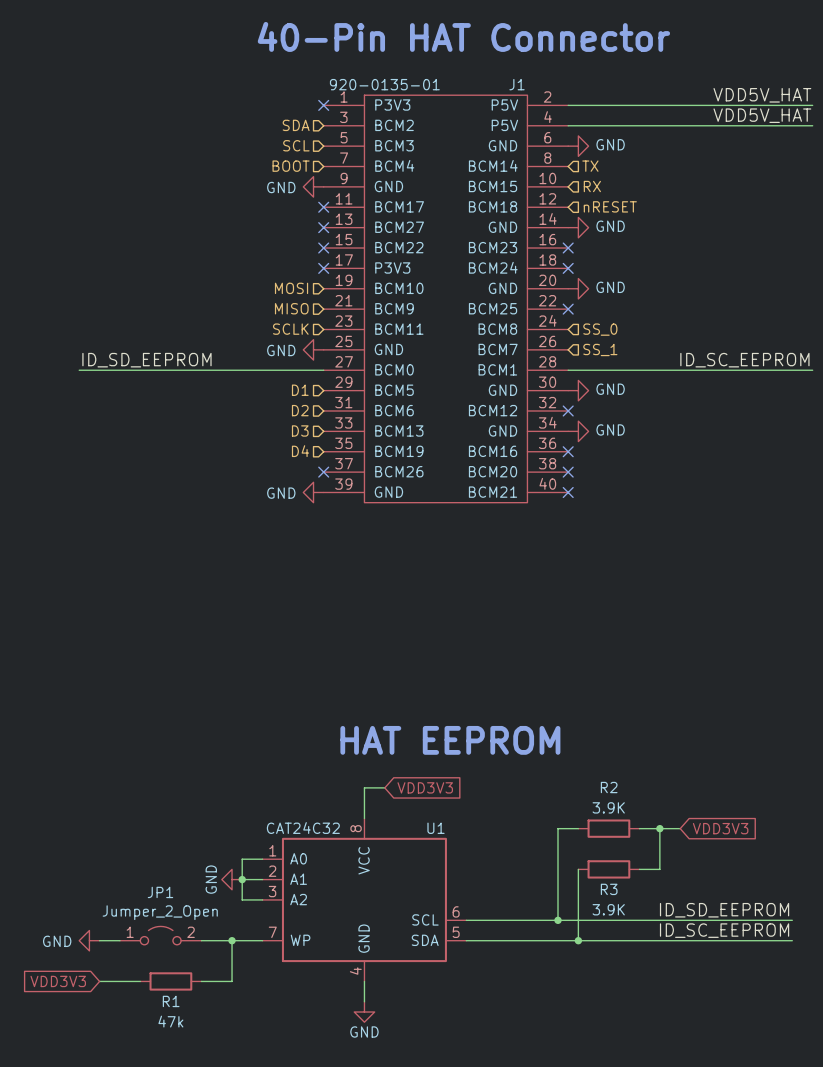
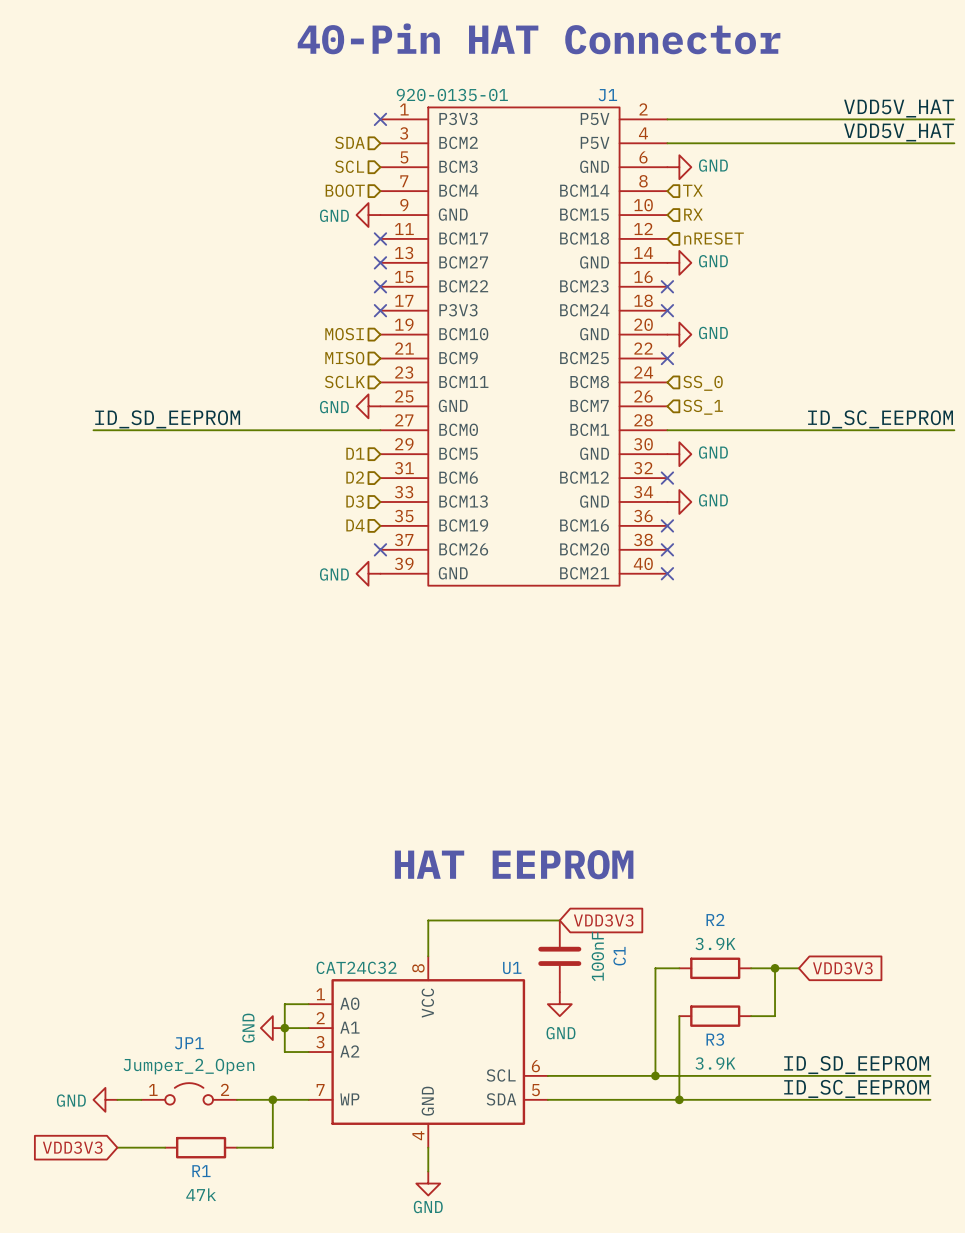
wire: none -> (452, 920) (559, 920)
global label position: VDD3V3 (425, 787) -> VDD3V3 (603, 920)
C1: none -> 100nF (559, 956)
power symbol: none -> GND (559, 1004)

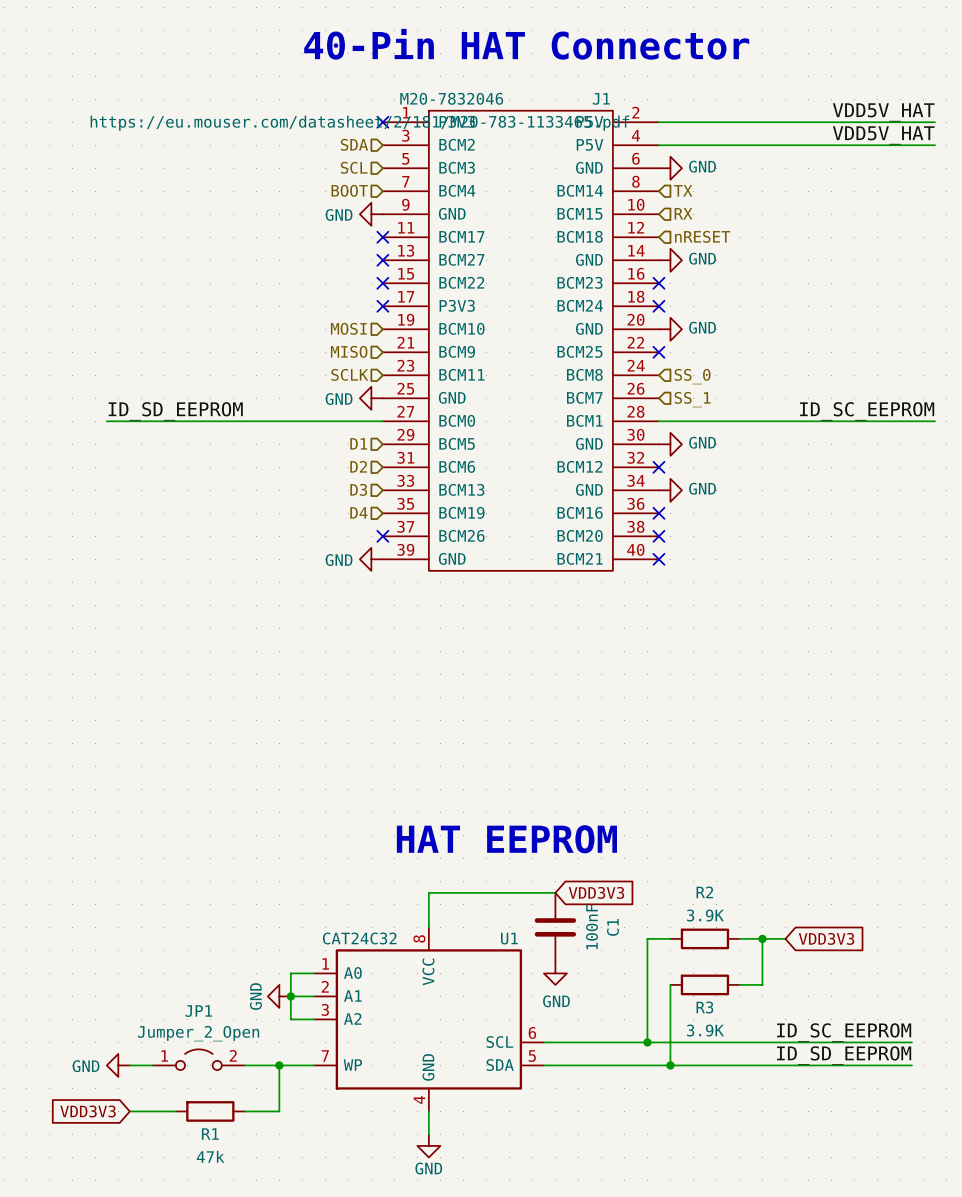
J1 value: 920-0135-01 (452, 95) -> M20-7832046 (451, 98)
J1 text: none -> https://eu.mouser.com/datasheet/2/181/M20-783-1133465.pdf (359, 123)
label: ID_SD_EEPROM (856, 1065) -> ID_SC_EEPROM (844, 1032)
label: ID_SC_EEPROM (856, 1088) -> ID_SD_EEPROM (844, 1055)

